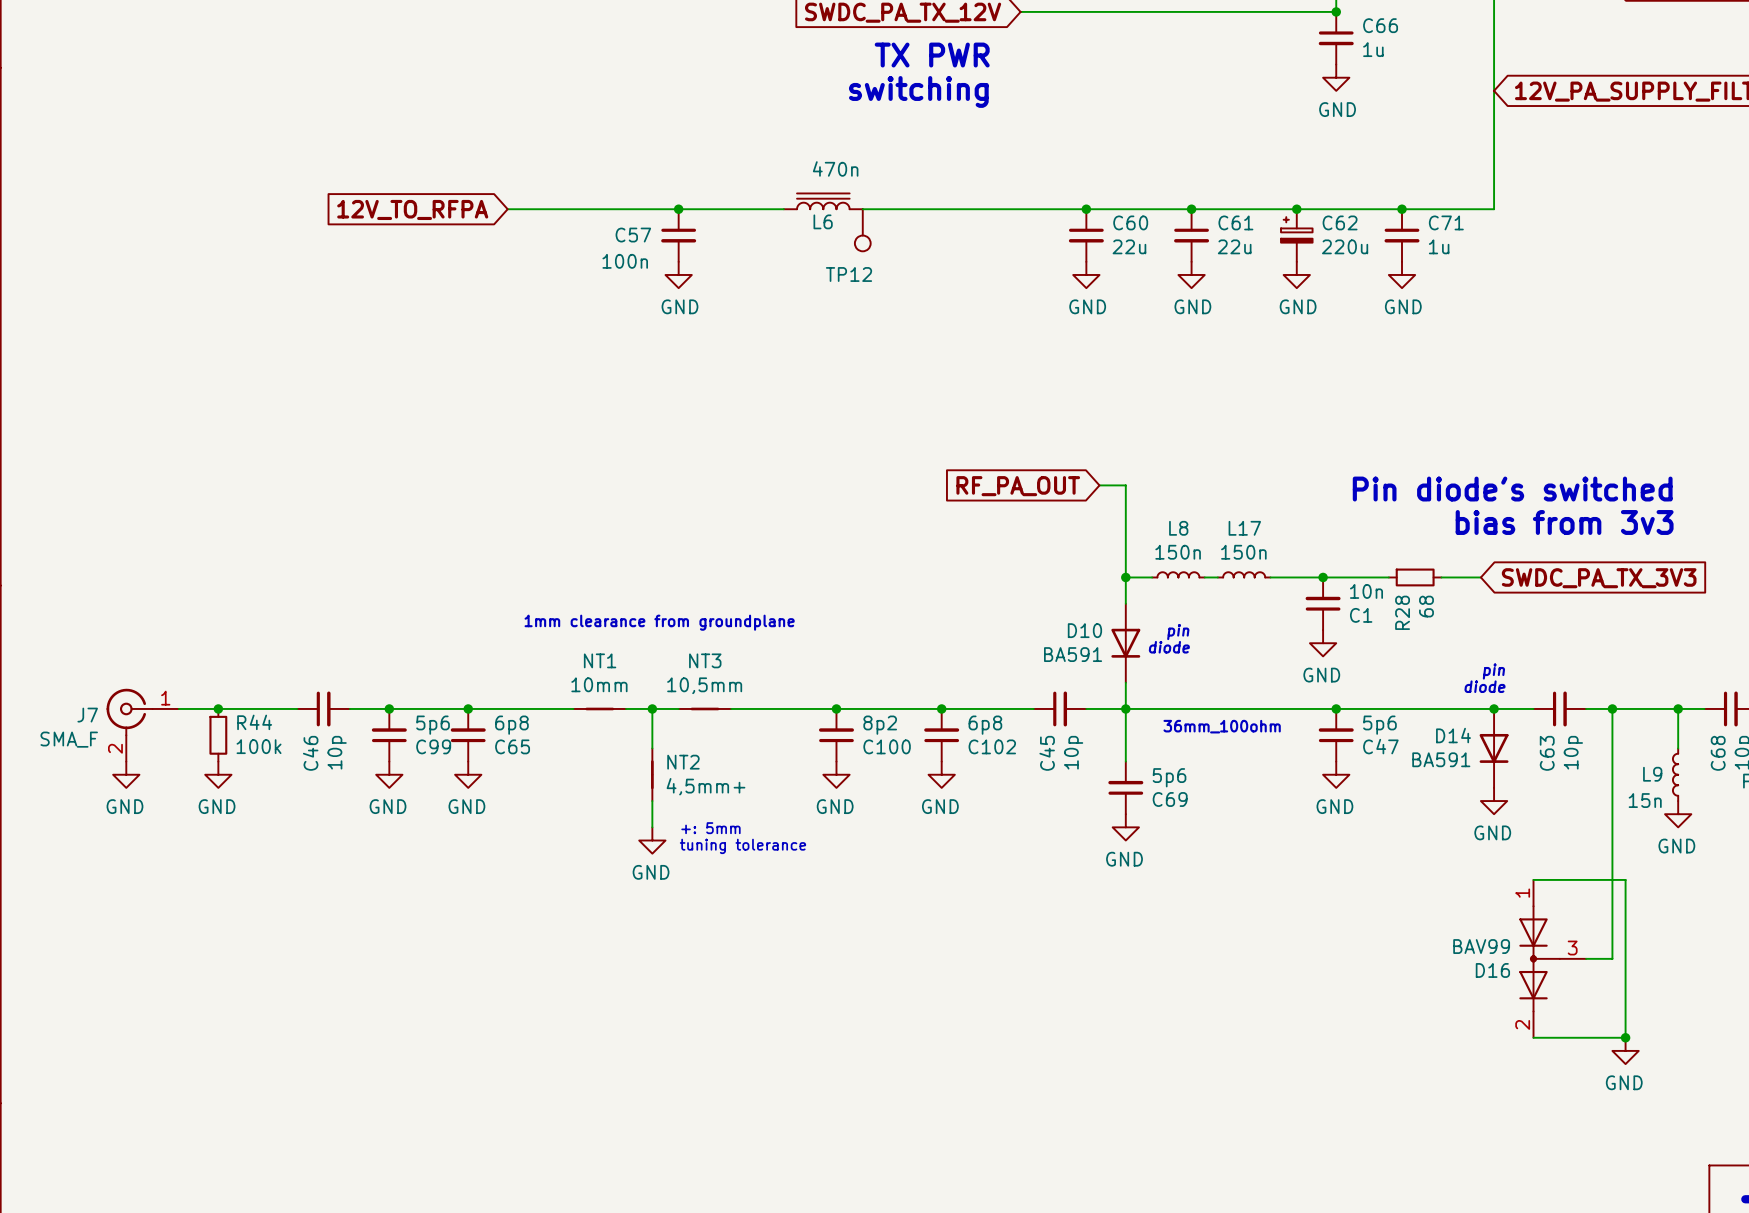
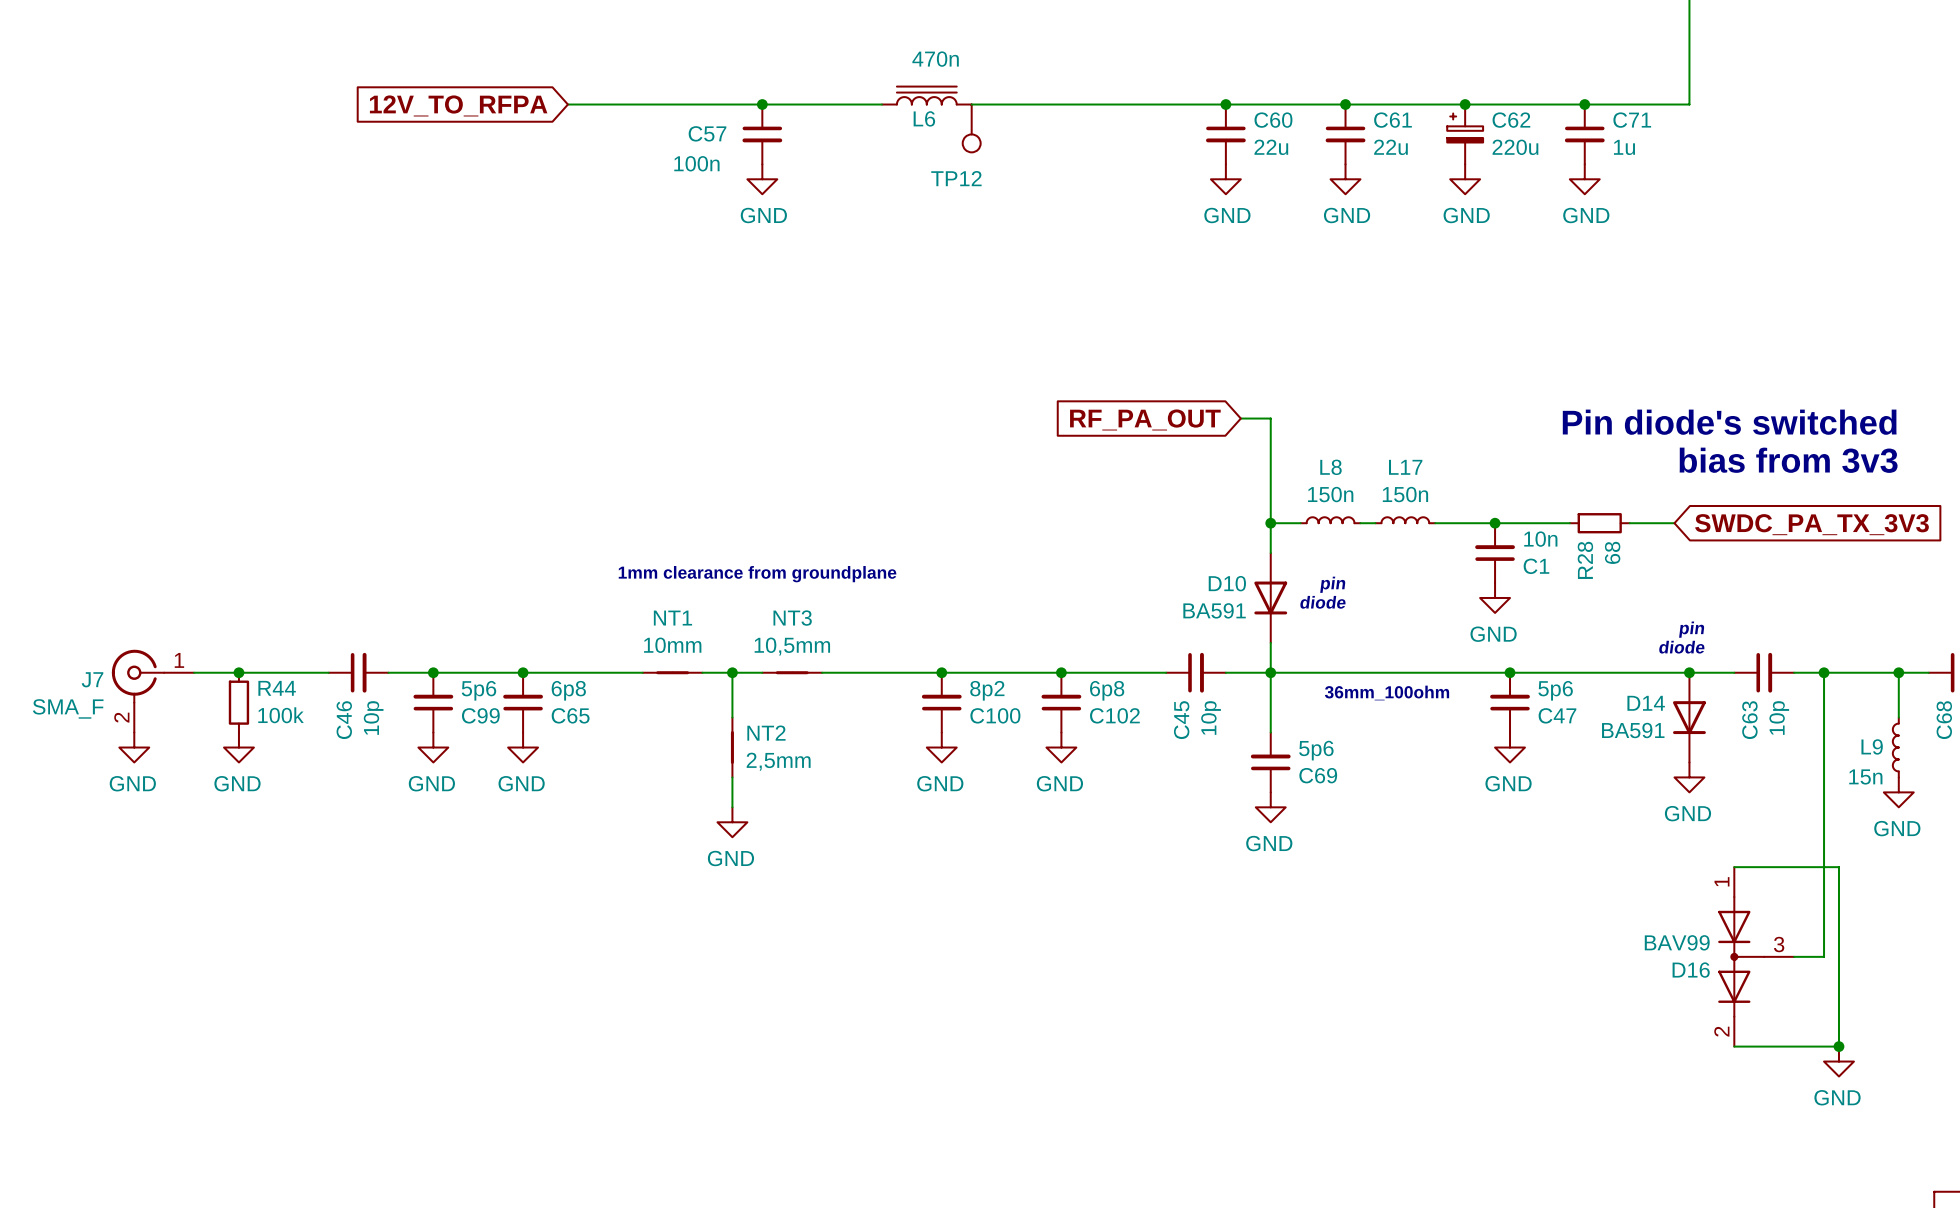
NT2 value: 4,5mm+ (705, 786) -> 2,5mm (778, 761)
text: +: 5mm (710, 828) -> none
text: tuning tolerance (742, 846) -> none

